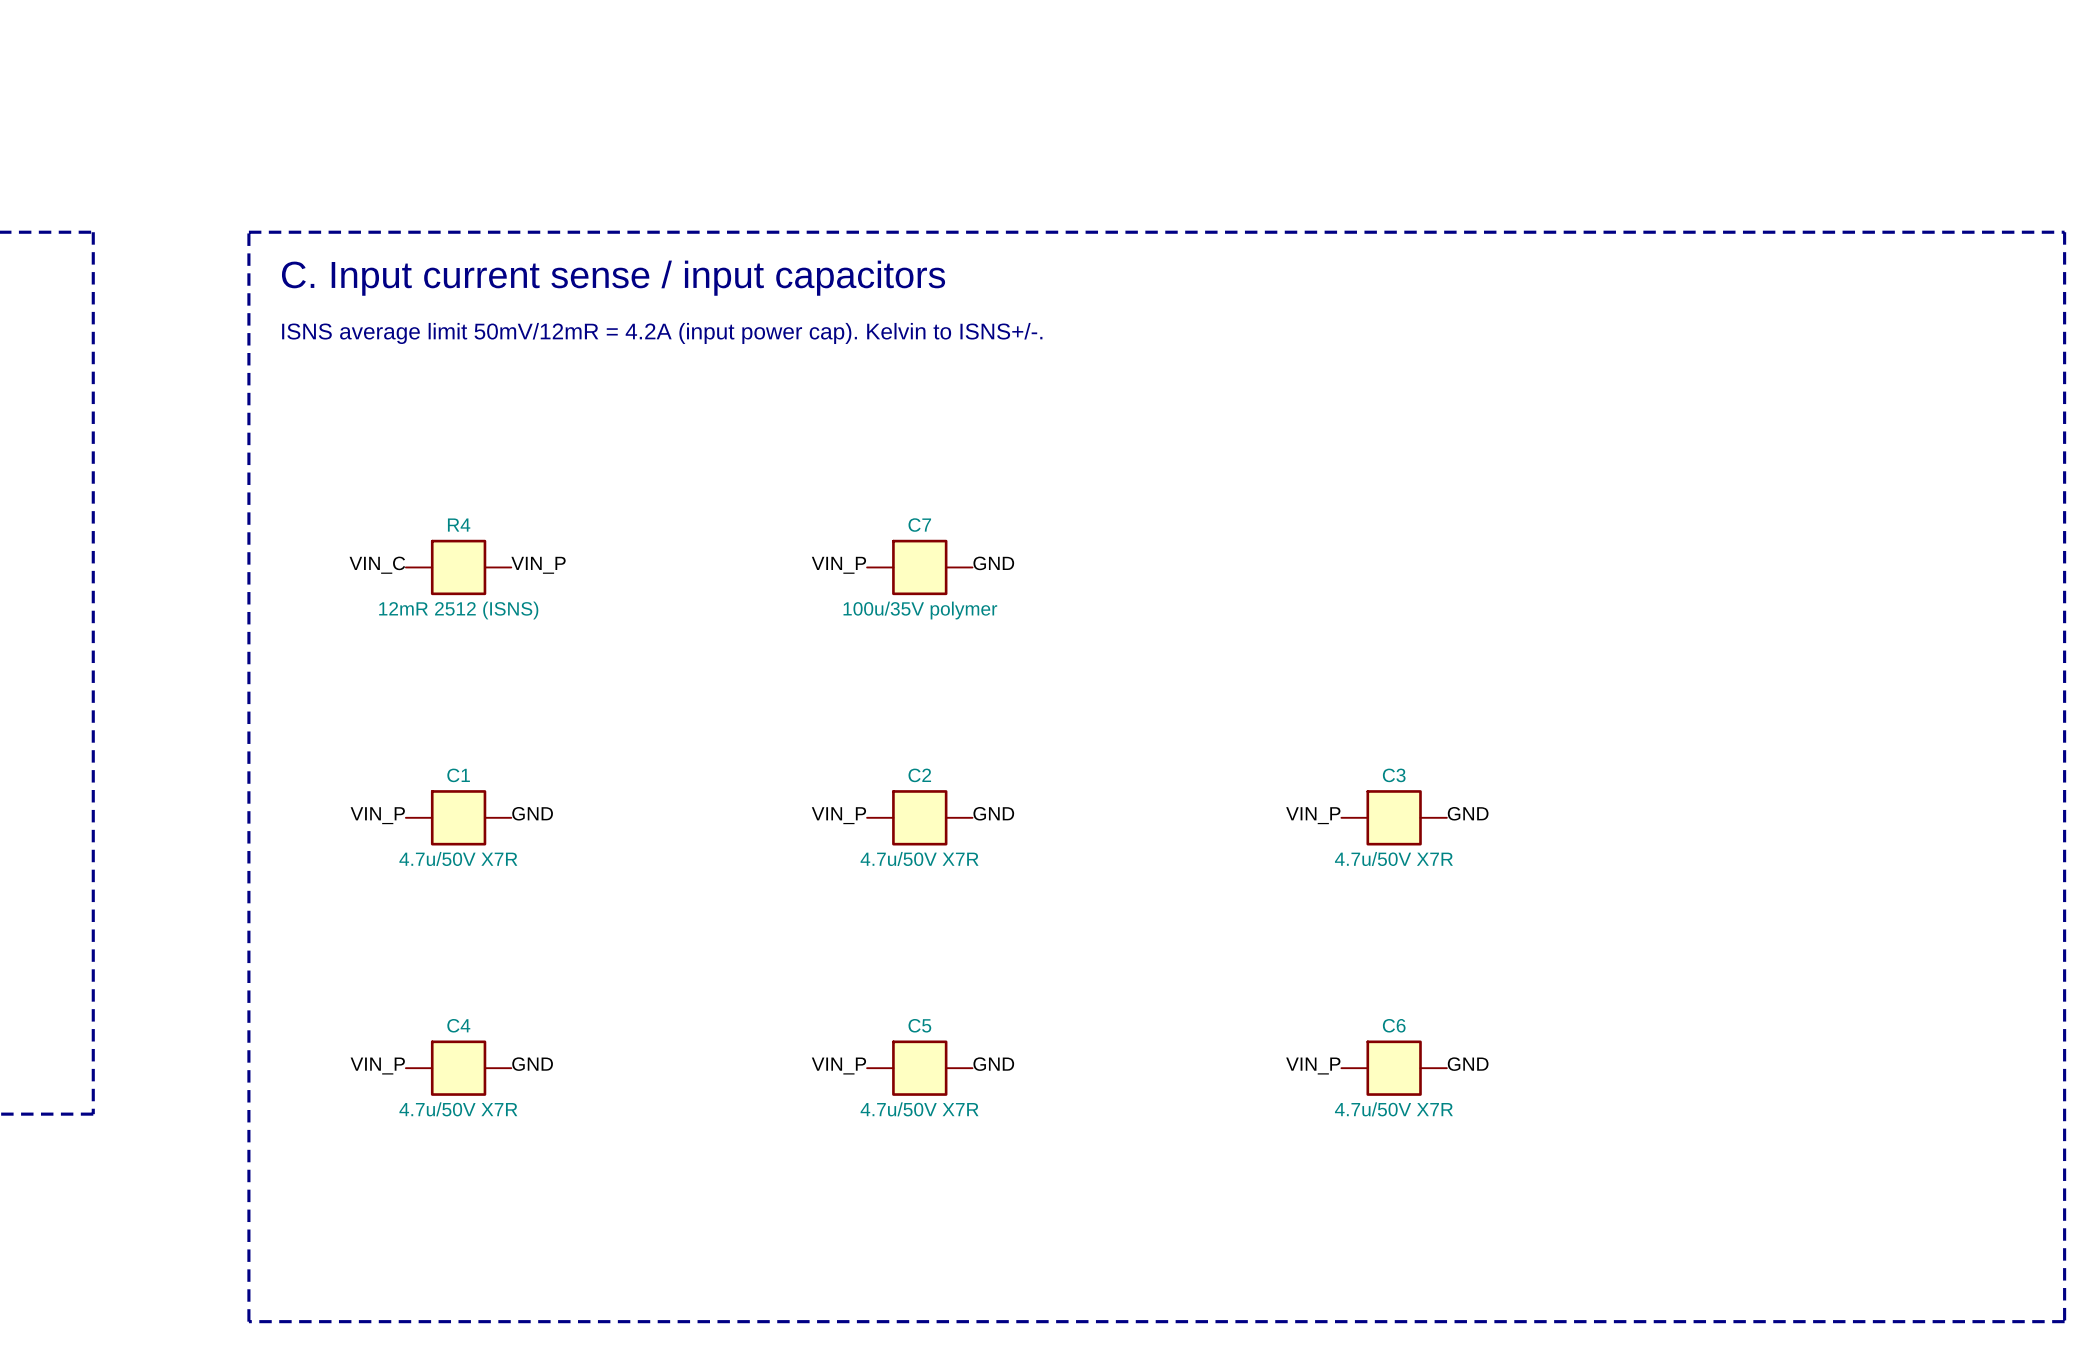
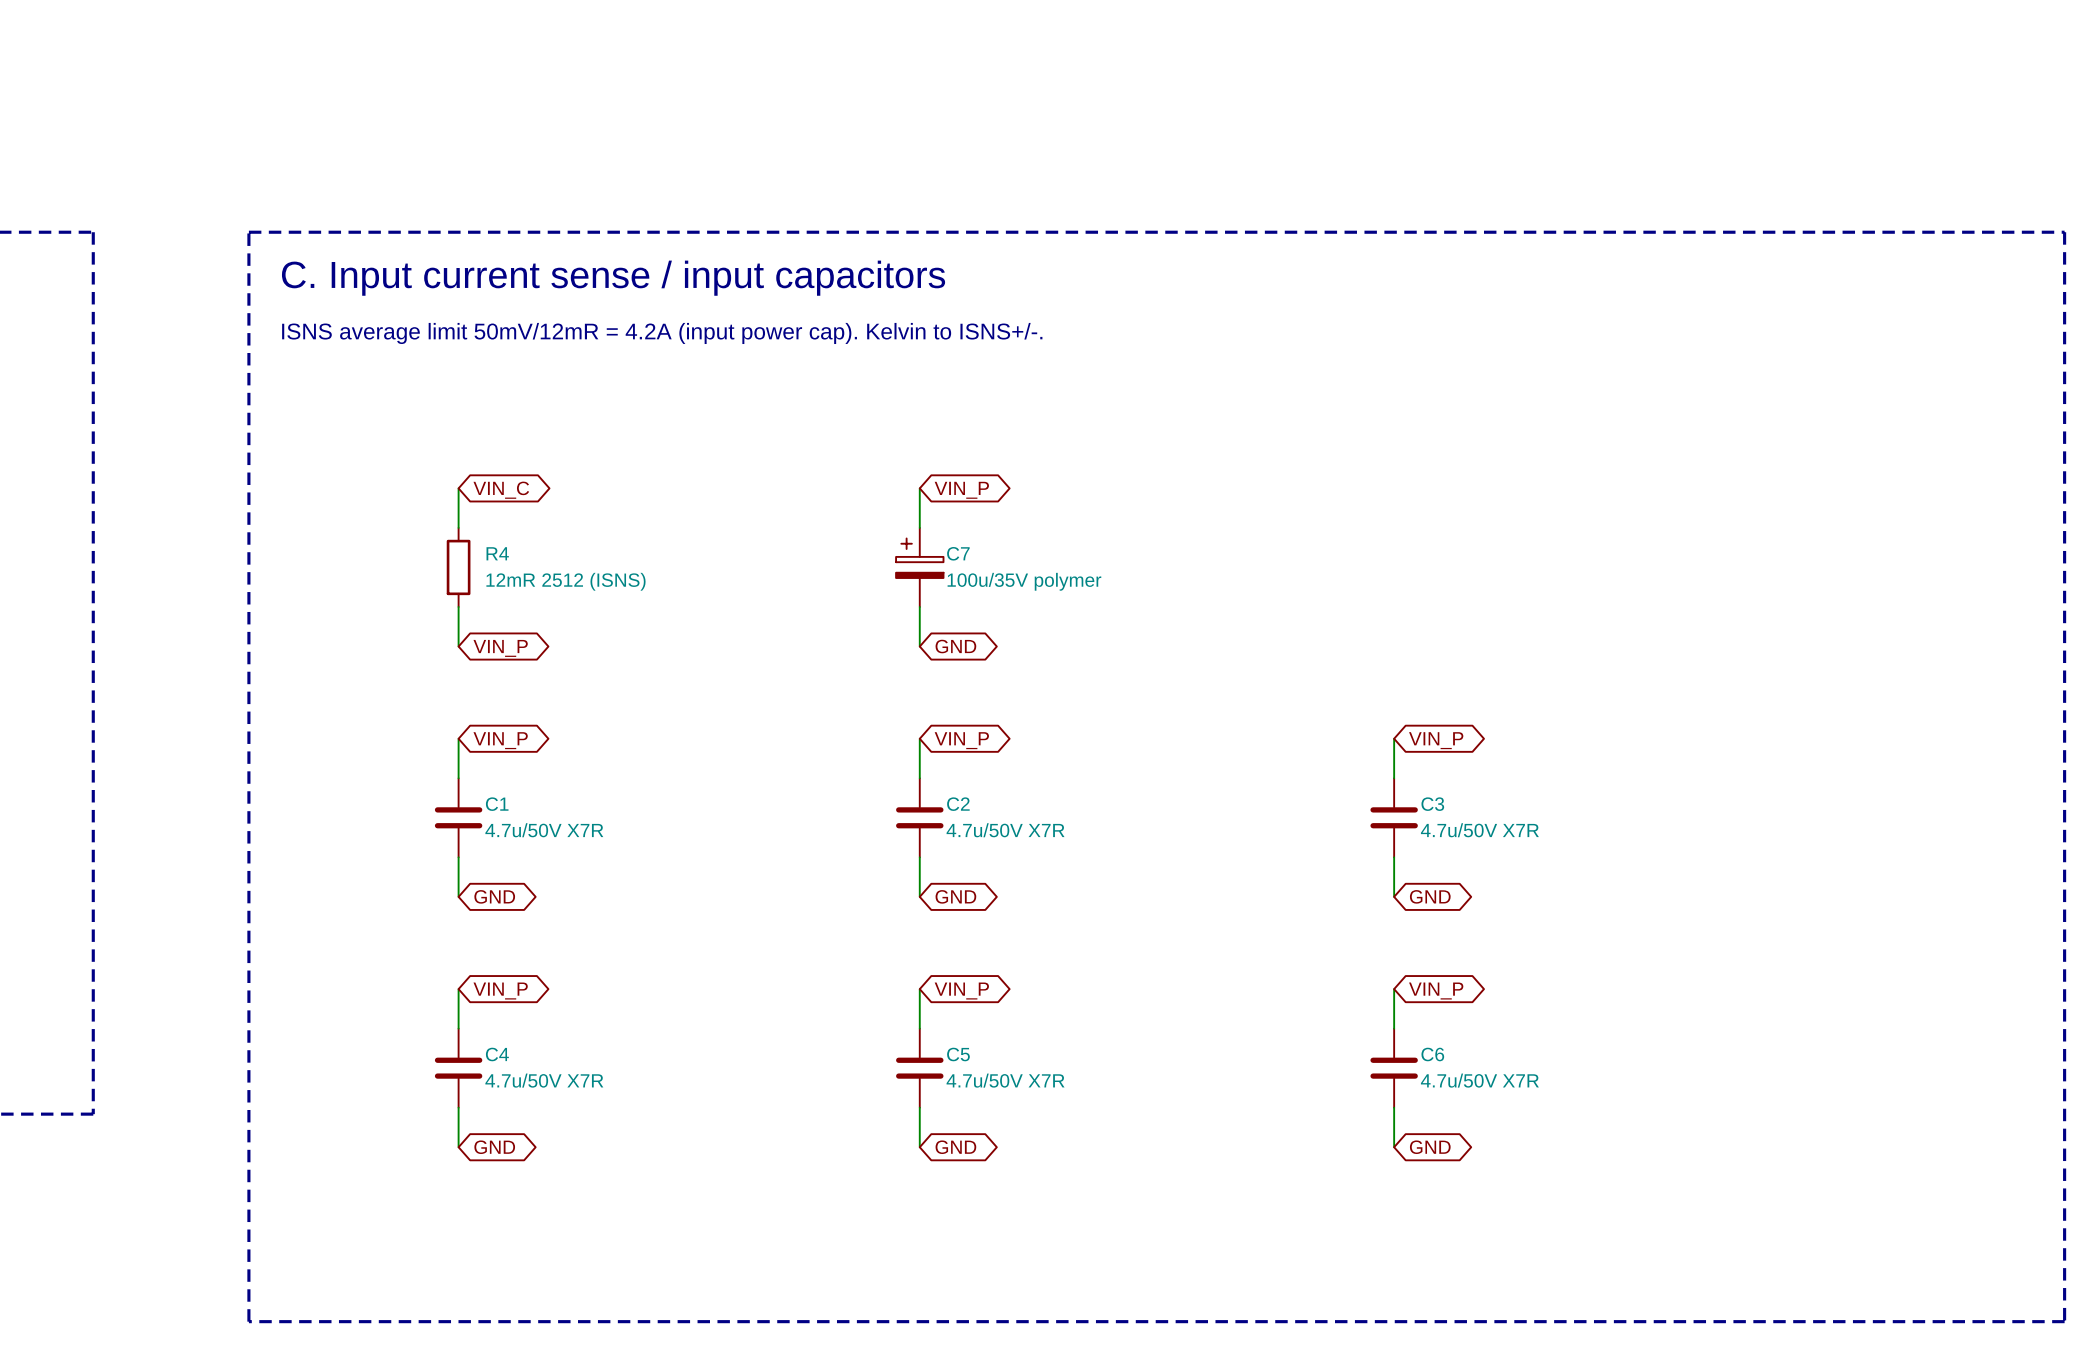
wire: none -> (458, 488) (458, 527)
wire: none -> (919, 488) (919, 527)
global label: none -> VIN_C (501, 490)
global label: none -> VIN_P (961, 490)
R4 name position: R4 (459, 525) -> R4 (497, 553)
C7 name position: C7 (919, 525) -> C7 (958, 553)
R4 symbol: [405, 539, 512, 596] -> [446, 527, 471, 607]
C7 symbol: [867, 539, 973, 596] -> [896, 527, 944, 607]
label: GND (993, 563) -> none
label: VIN_C (377, 565) -> none
label: VIN_P (538, 565) -> none
label: VIN_P (838, 565) -> none
wire: none -> (458, 606) (458, 646)
wire: none -> (919, 606) (919, 646)
R4 value position: 12mR 2512 (ISNS) (458, 610) -> 12mR 2512 (ISNS) (565, 581)
C7 value position: 100u/35V polymer (920, 610) -> 100u/35V polymer (1024, 581)
global label: none -> GND (955, 646)
global label: none -> VIN_P (500, 648)
wire: none -> (458, 738) (458, 778)
wire: none -> (919, 738) (919, 778)
wire: none -> (1394, 738) (1394, 778)
global label: none -> VIN_P (500, 740)
global label: none -> VIN_P (961, 740)
global label: none -> VIN_P (1436, 740)
C1 name position: C1 (458, 775) -> C1 (497, 804)
C2 name position: C2 (919, 775) -> C2 (958, 804)
C3 name position: C3 (1394, 775) -> C3 (1432, 804)
C1 symbol: [405, 790, 512, 846] -> [434, 778, 483, 858]
C2 symbol: [867, 790, 973, 846] -> [896, 778, 944, 858]
C3 symbol: [1341, 790, 1447, 846] -> [1370, 778, 1418, 858]
label: GND (532, 813) -> none
label: GND (993, 813) -> none
label: GND (1468, 813) -> none
label: VIN_P (377, 815) -> none
label: VIN_P (838, 815) -> none
label: VIN_P (1313, 815) -> none
wire: none -> (458, 857) (458, 896)
wire: none -> (919, 857) (919, 896)
wire: none -> (1394, 857) (1394, 896)
C1 value position: 4.7u/50V X7R (458, 858) -> 4.7u/50V X7R (544, 830)
C2 value position: 4.7u/50V X7R (919, 858) -> 4.7u/50V X7R (1005, 830)
C3 value position: 4.7u/50V X7R (1393, 858) -> 4.7u/50V X7R (1479, 830)
global label: none -> GND (494, 896)
global label: none -> GND (955, 896)
global label: none -> GND (1430, 896)
wire: none -> (458, 989) (458, 1028)
wire: none -> (919, 989) (919, 1028)
wire: none -> (1394, 989) (1394, 1028)
global label: none -> VIN_P (500, 991)
global label: none -> VIN_P (961, 991)
global label: none -> VIN_P (1436, 991)
C4 name position: C4 (458, 1025) -> C4 (497, 1054)
C5 name position: C5 (919, 1025) -> C5 (958, 1054)
C6 name position: C6 (1394, 1025) -> C6 (1432, 1054)
C4 symbol: [405, 1040, 512, 1096] -> [434, 1028, 483, 1108]
C5 symbol: [867, 1040, 973, 1096] -> [896, 1028, 944, 1108]
C6 symbol: [1341, 1040, 1447, 1096] -> [1370, 1028, 1418, 1108]
label: GND (532, 1064) -> none
label: GND (993, 1064) -> none
label: GND (1468, 1064) -> none
label: VIN_P (377, 1066) -> none
label: VIN_P (838, 1066) -> none
label: VIN_P (1313, 1066) -> none
wire: none -> (458, 1107) (458, 1147)
wire: none -> (919, 1107) (919, 1147)
wire: none -> (1394, 1107) (1394, 1147)
C4 value position: 4.7u/50V X7R (458, 1109) -> 4.7u/50V X7R (544, 1080)
C5 value position: 4.7u/50V X7R (919, 1109) -> 4.7u/50V X7R (1005, 1080)
C6 value position: 4.7u/50V X7R (1393, 1109) -> 4.7u/50V X7R (1479, 1080)
global label: none -> GND (494, 1147)
global label: none -> GND (955, 1147)
global label: none -> GND (1430, 1147)

